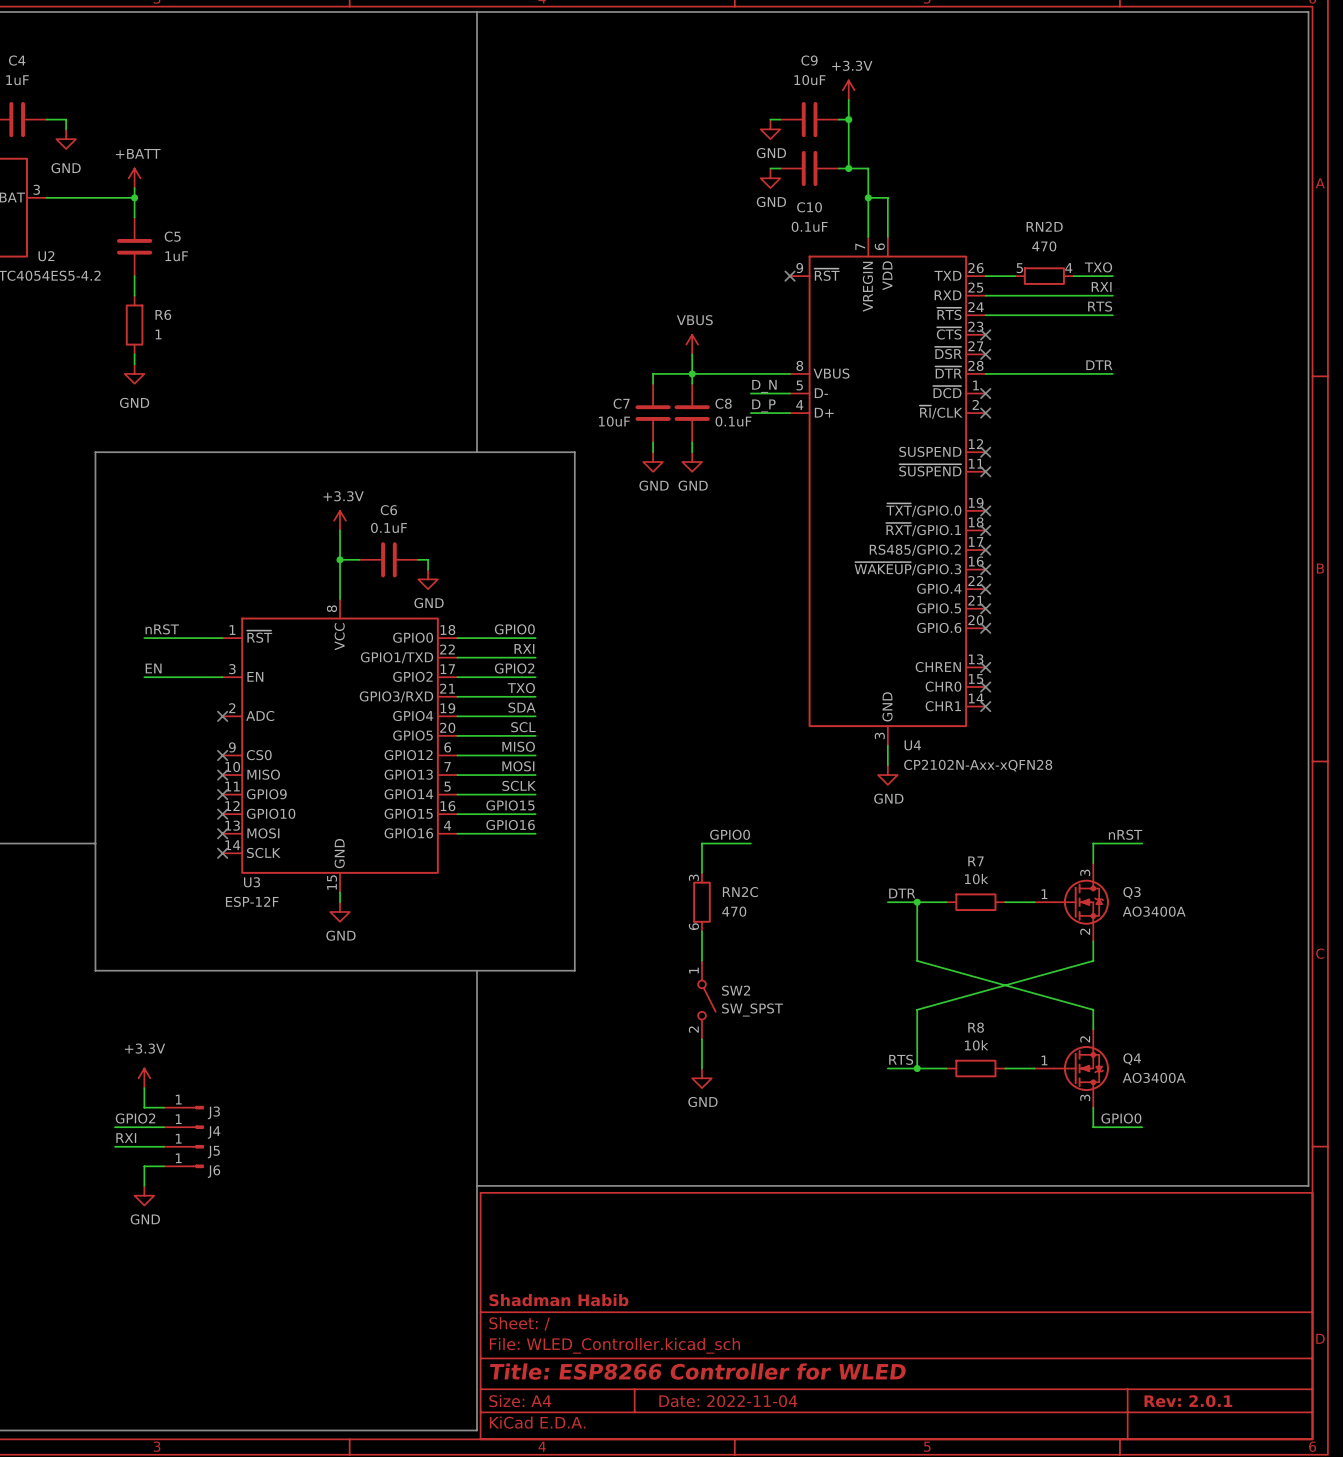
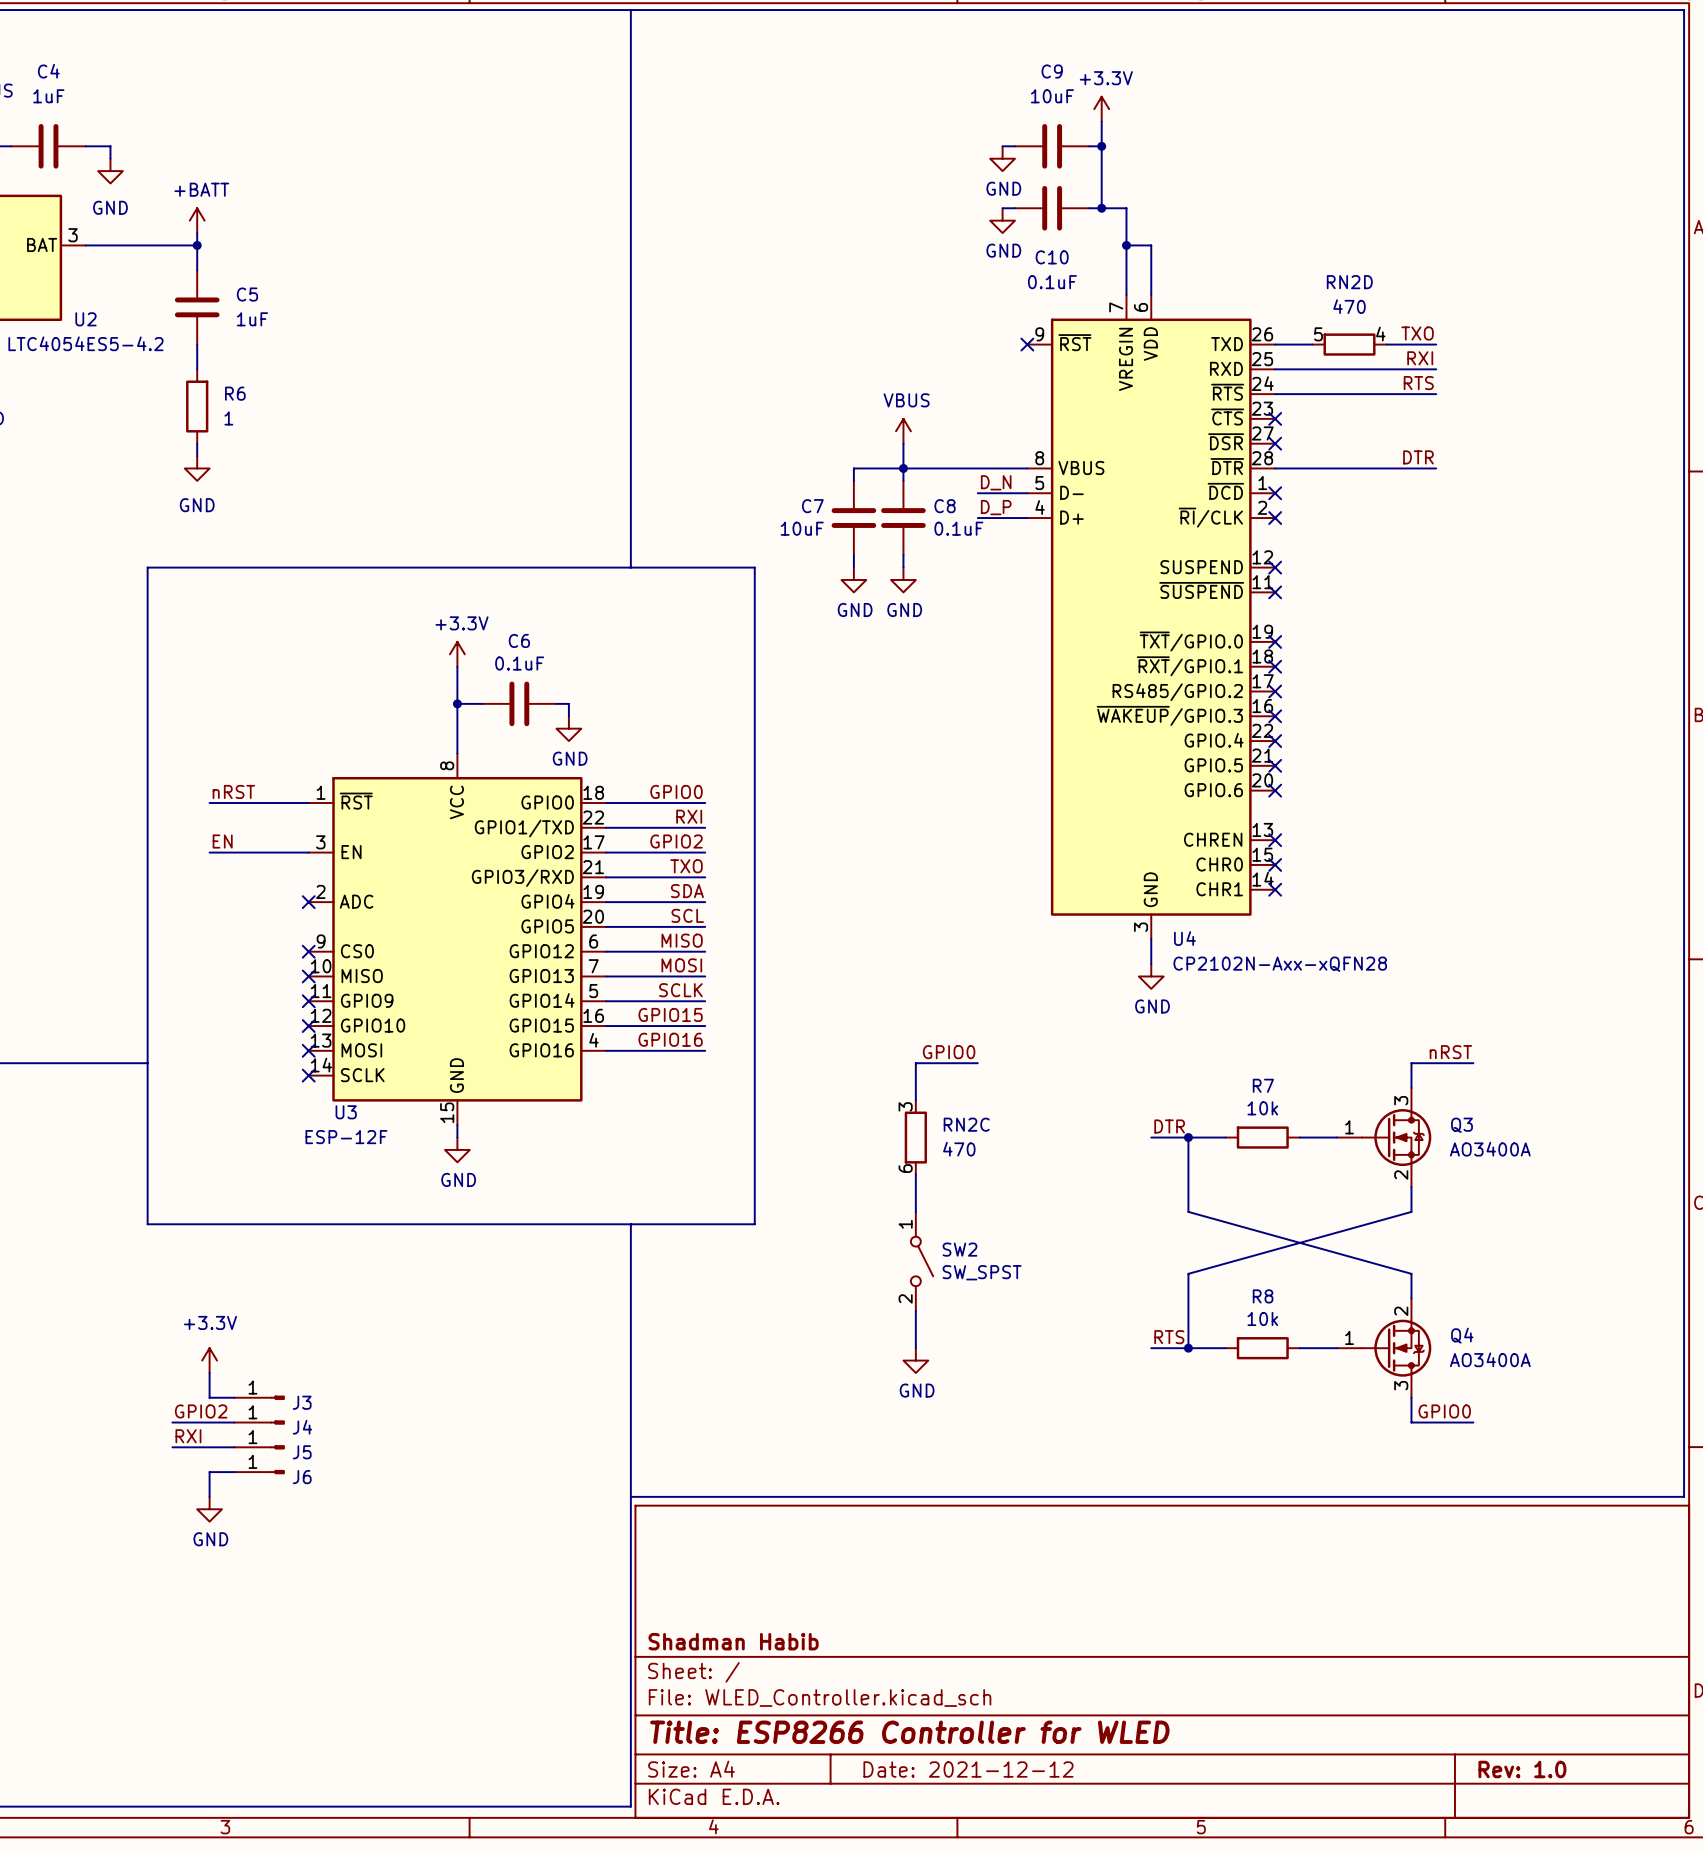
title block: Date: 2022-11-04 (728, 1401) -> Date: 2021-12-12 (968, 1769)
title block: Rev: 2.0.1 (1188, 1401) -> Rev: 1.0 (1522, 1769)

